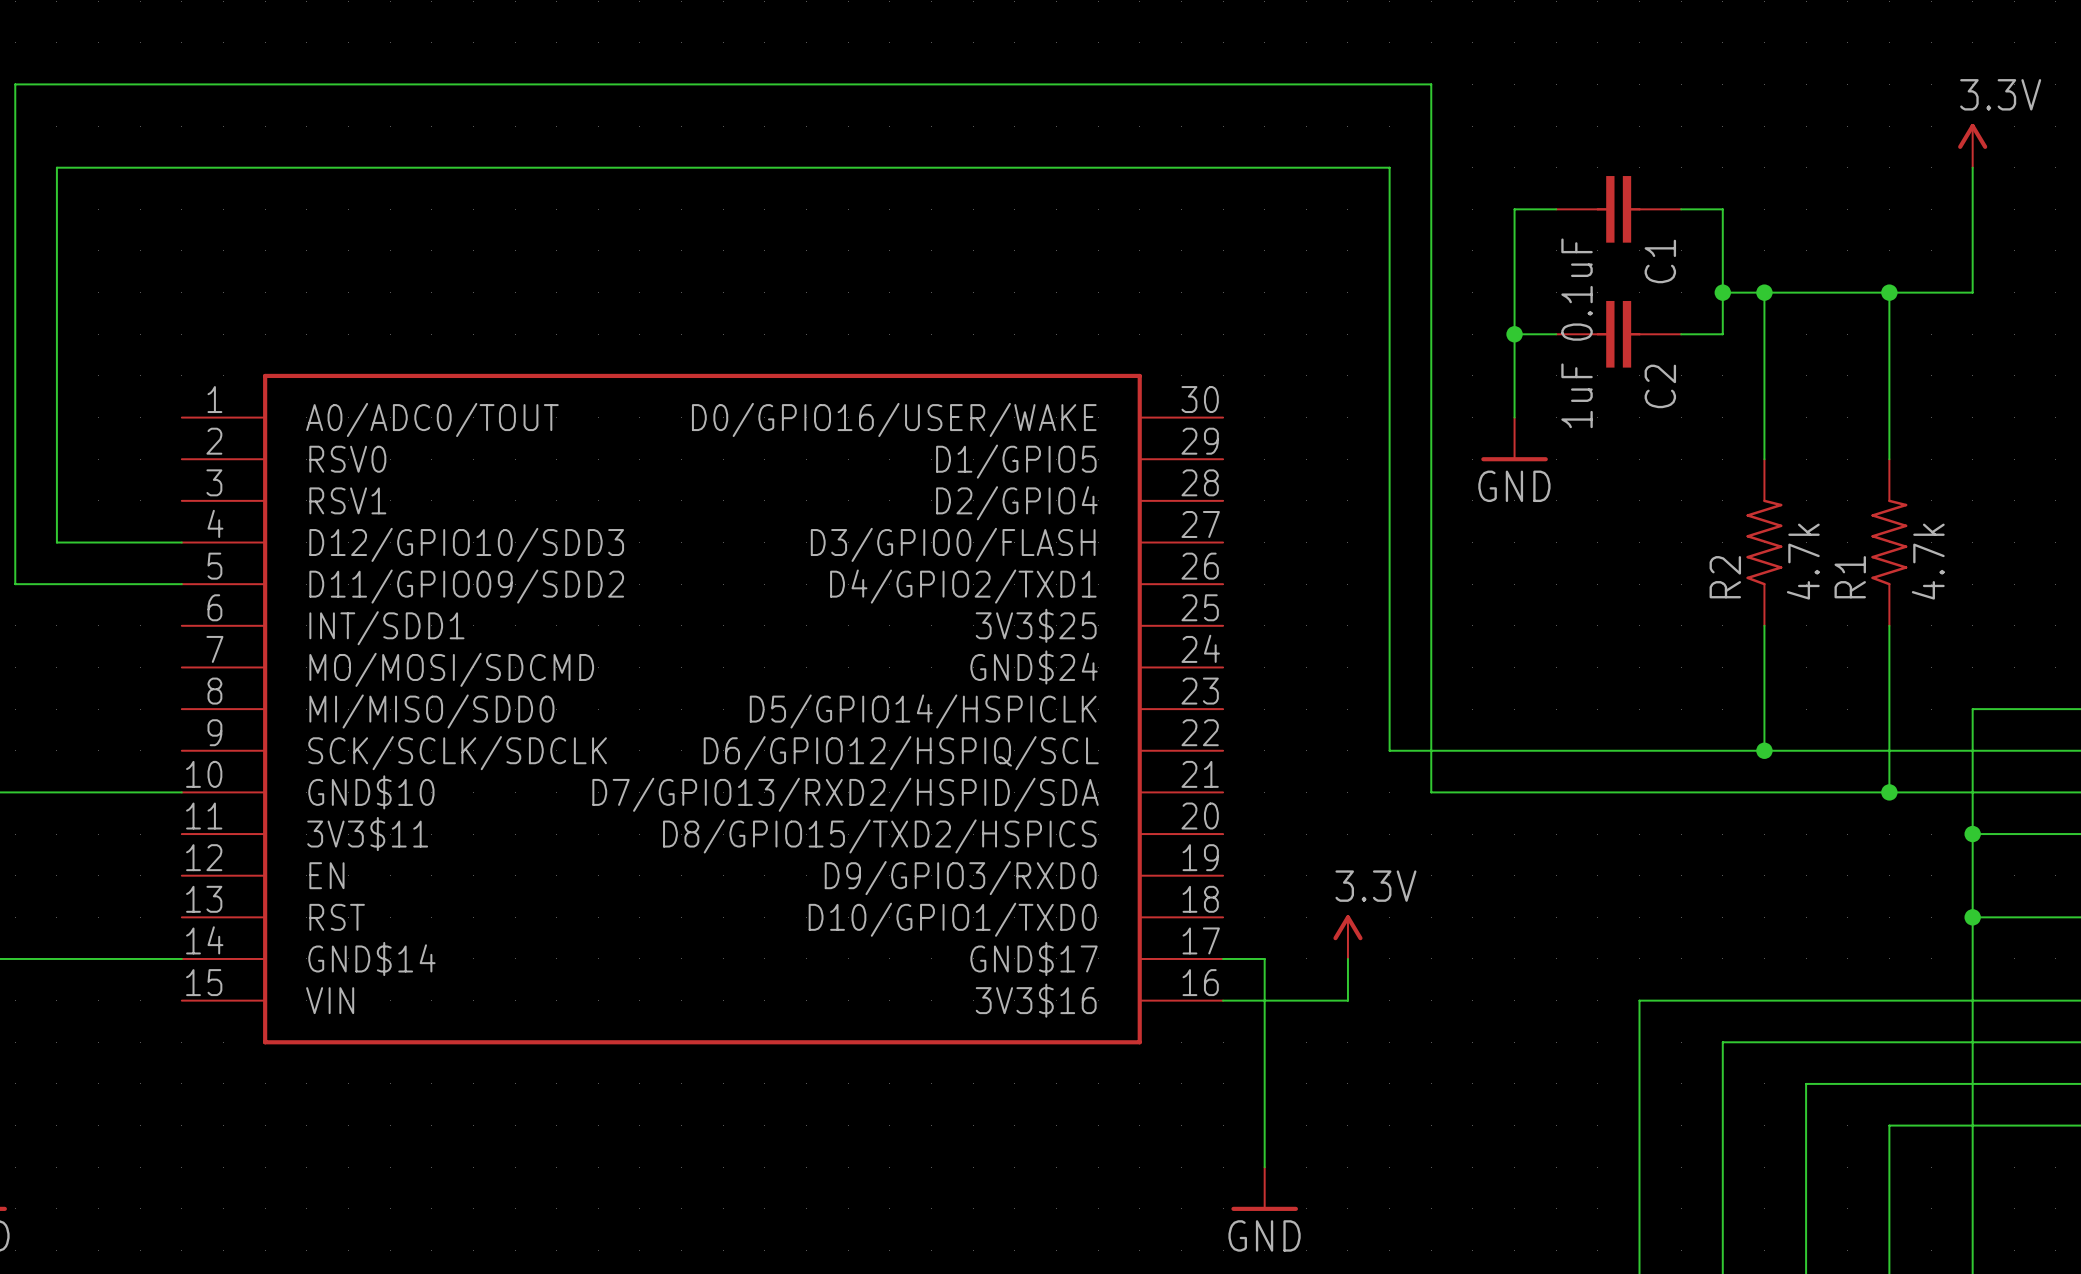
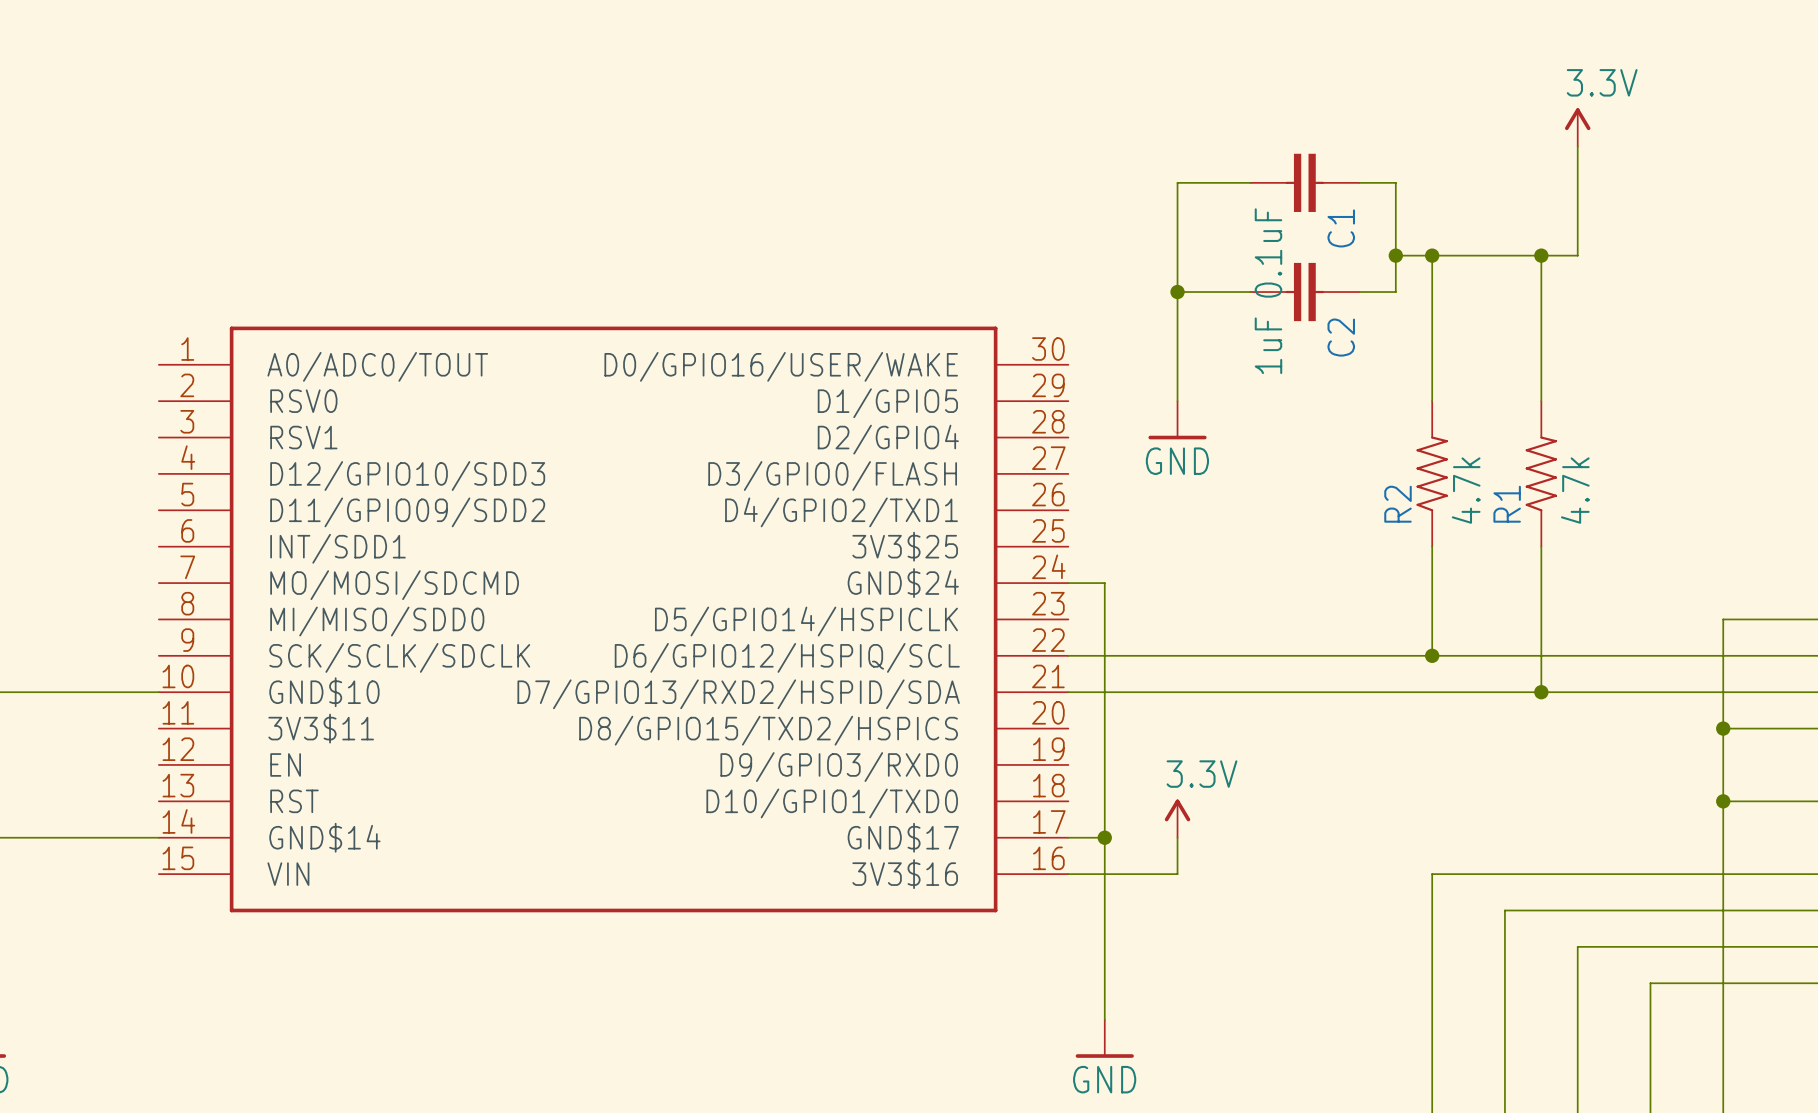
power symbol position: 3.3V (1972, 145) -> 3.3V (1577, 127)
wire: (1972, 167) (1972, 292) (1806, 292) -> (1577, 146) (1577, 255)
wire: none -> (1250, 182) (1177, 182) (1177, 401)
wire: (1556, 209) (1514, 209) (1514, 417) -> (1359, 182) (1395, 182) (1395, 292) (1359, 292)
C1 position: (1618, 209) -> (1304, 182)
wire: (1681, 209) (1722, 209) (1722, 334) (1681, 334) -> none
wire: none -> (1395, 255) (1504, 255)
junction: none -> (1395, 255)
junction: none -> (1432, 255)
junction: (1722, 292) -> none
wire: (1889, 292) (1889, 459) -> (1432, 255) (1432, 401)
junction: (1889, 292) -> none
wire: none -> (1177, 292) (1250, 292)
junction: none -> (1177, 292)
junction: (1514, 334) -> none
C2 position: (1618, 334) -> (1304, 292)
power symbol position: GND (1514, 439) -> GND (1177, 420)
wire: (181, 542) (56, 542) (56, 167) (1389, 167) (1389, 750) -> (1068, 655) (1213, 655)
R2: none -> 4.7k (1432, 473)
R1: 4.7k (1889, 542) -> none
R2 name: R2 (1725, 577) -> R1 (1507, 504)
wire: (181, 584) (15, 584) (15, 84) (1431, 84) (1431, 792) -> (1068, 692) (1250, 692)
wire: none -> (1432, 546) (1432, 655)
wire: (1889, 625) (1889, 792) -> none
wire: none -> (1068, 583) (1104, 583) (1104, 837)
junction: none -> (1432, 655)
wire: none -> (1541, 655) (1541, 692)
junction position: (1764, 750) -> (1541, 692)
junction: (1889, 792) -> none
junction: none -> (1104, 837)

